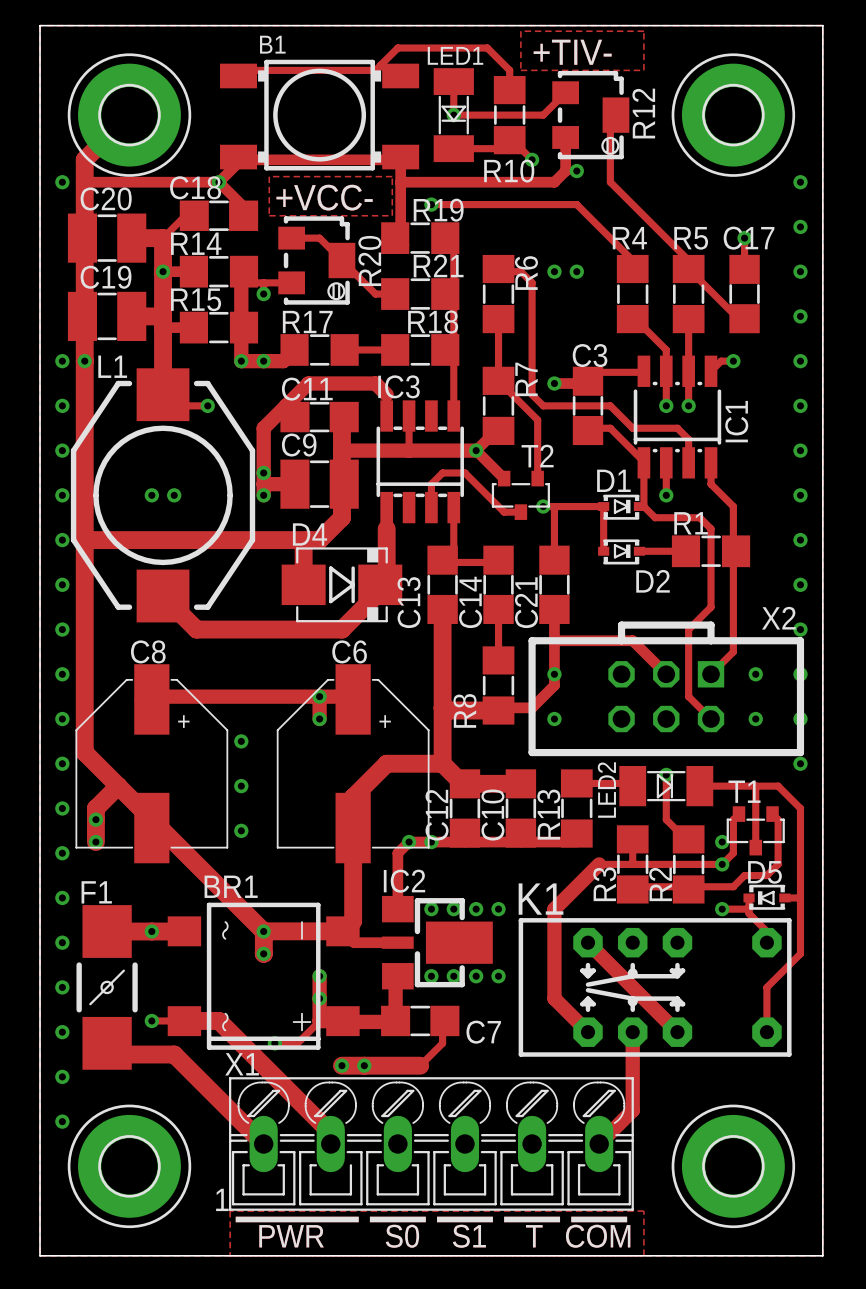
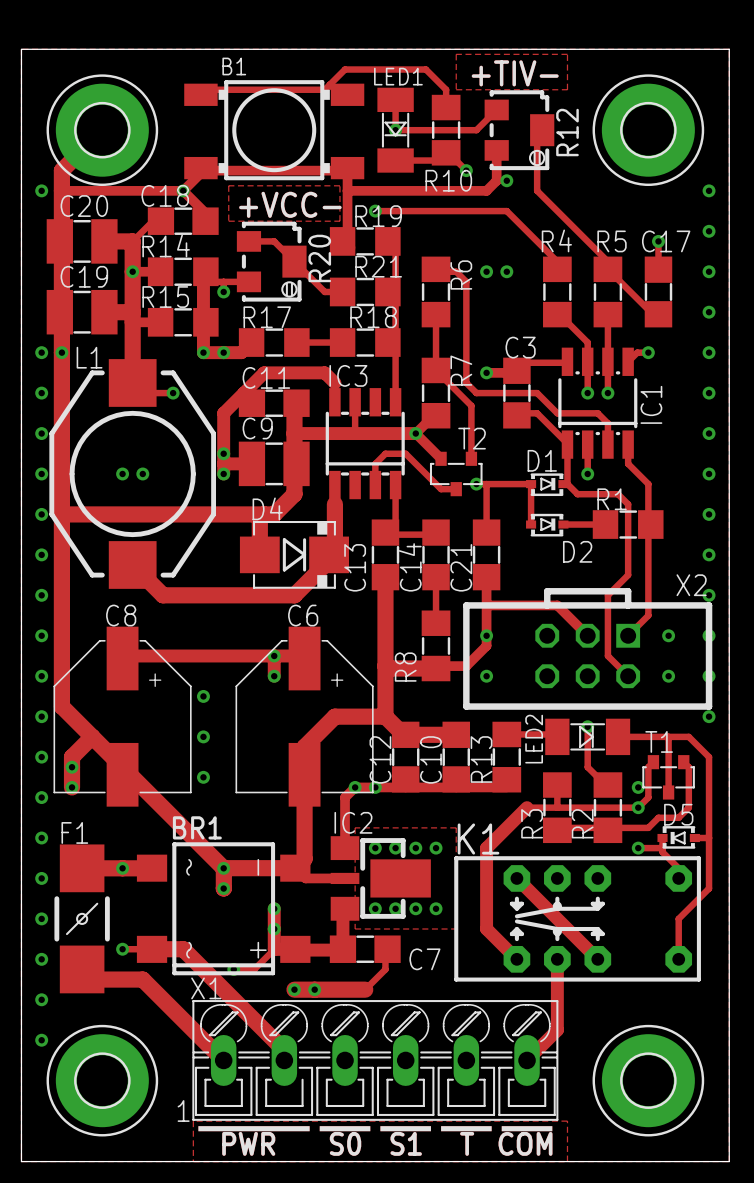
zone outline: none -> (355, 827) (355, 929) (456, 929) (456, 827) (355, 827)

